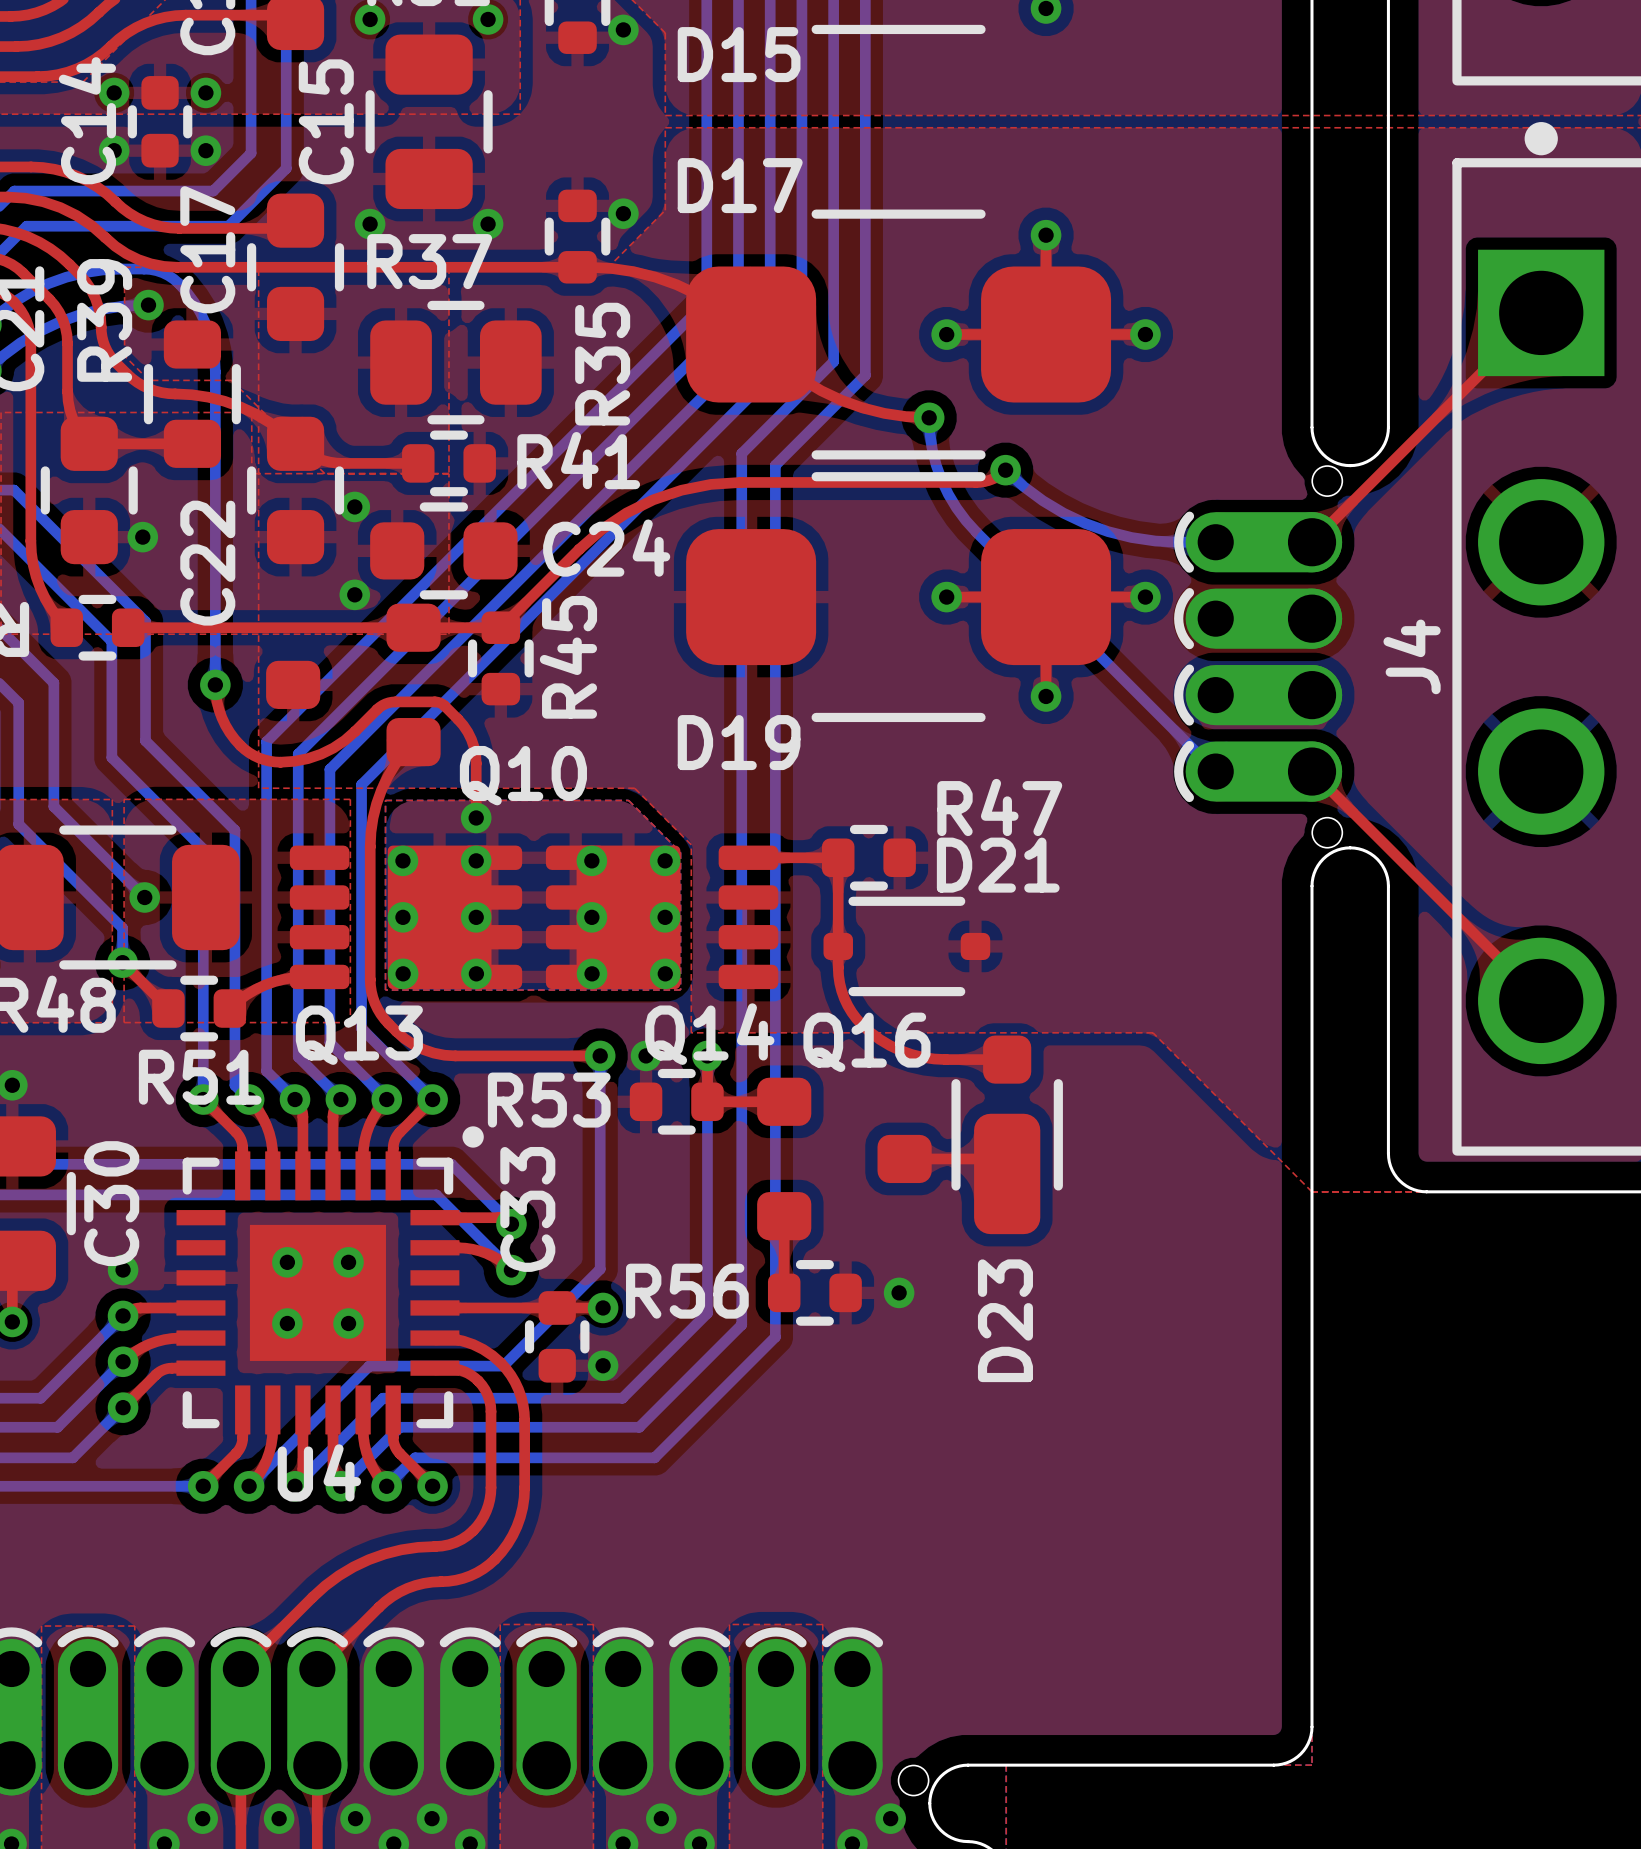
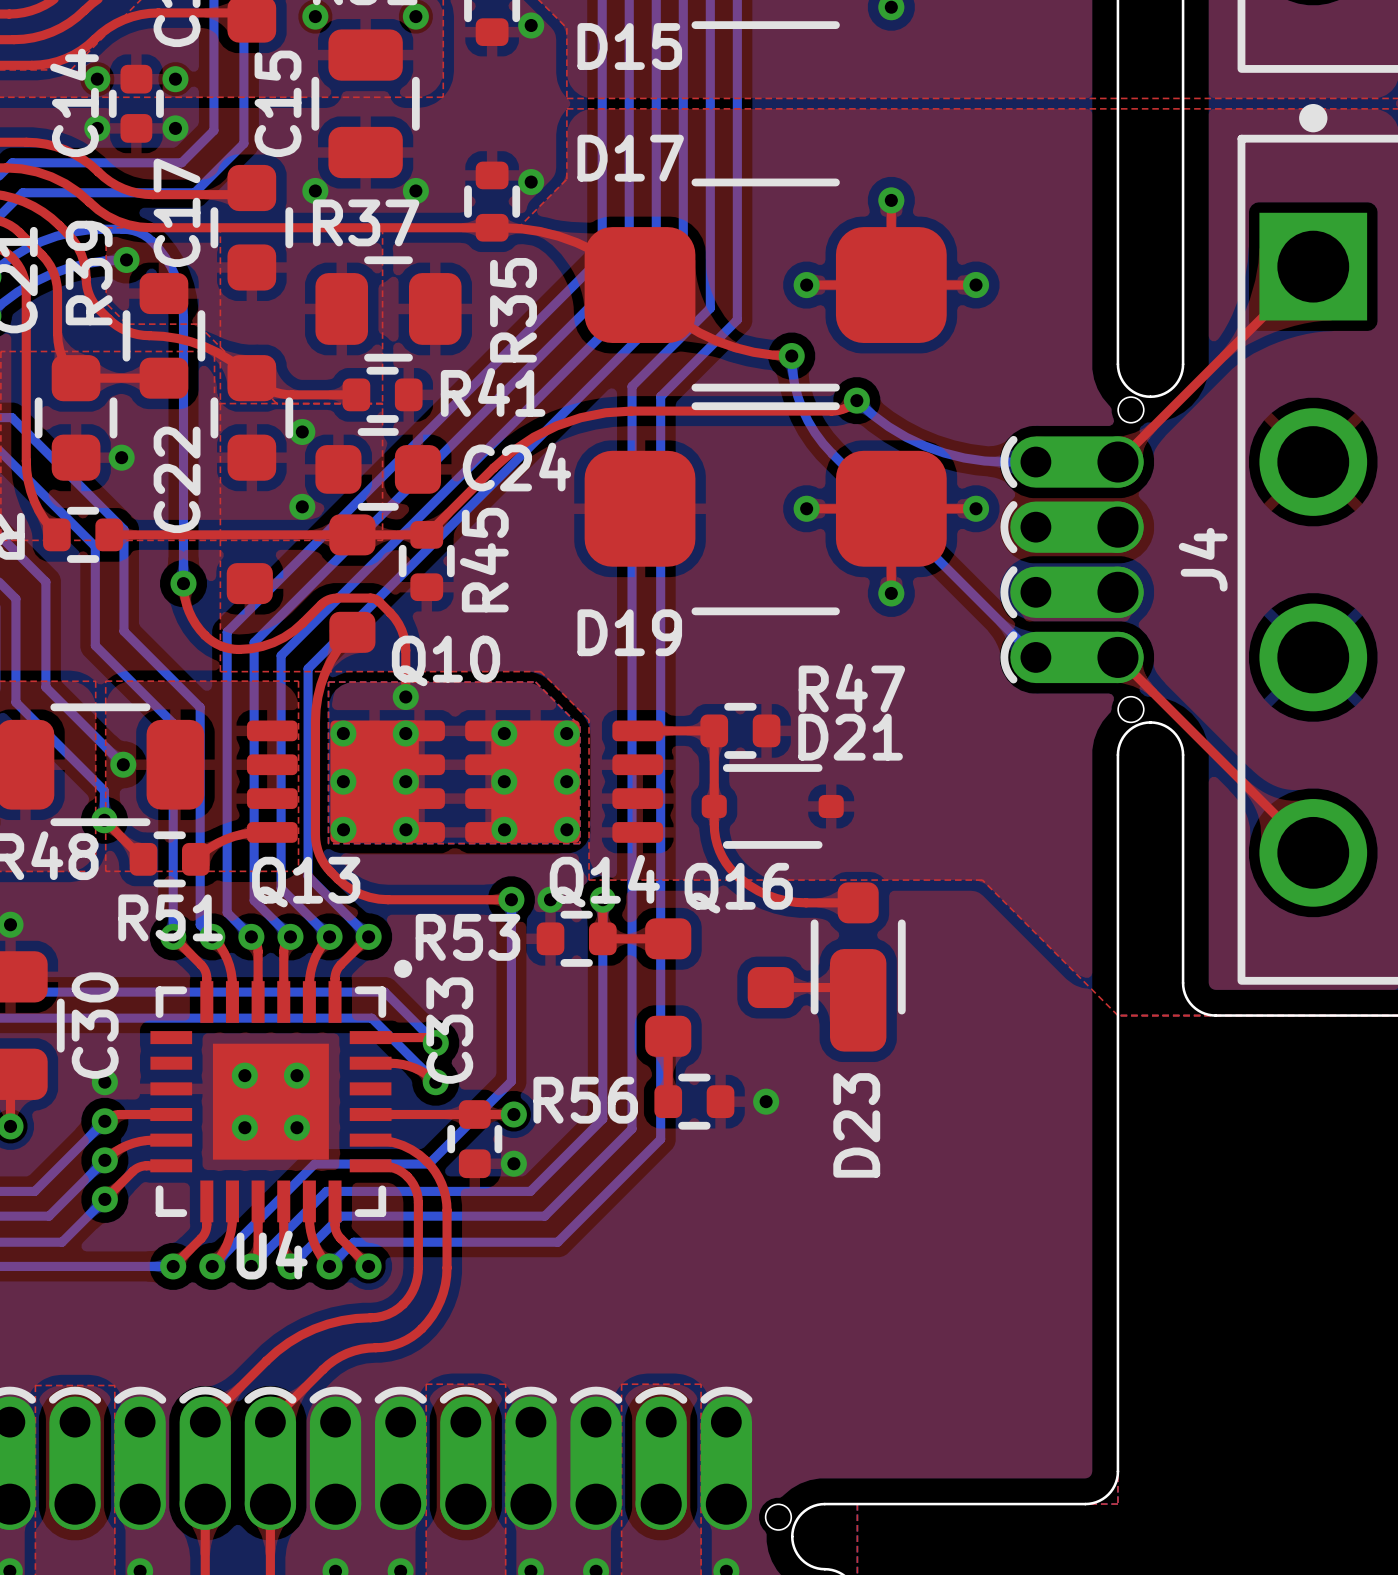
via: (202, 1818) -> none
via: (279, 1818) -> none
via: (355, 1818) -> none
via: (432, 1818) -> none
via: (661, 1818) -> none
via: (890, 1818) -> none

